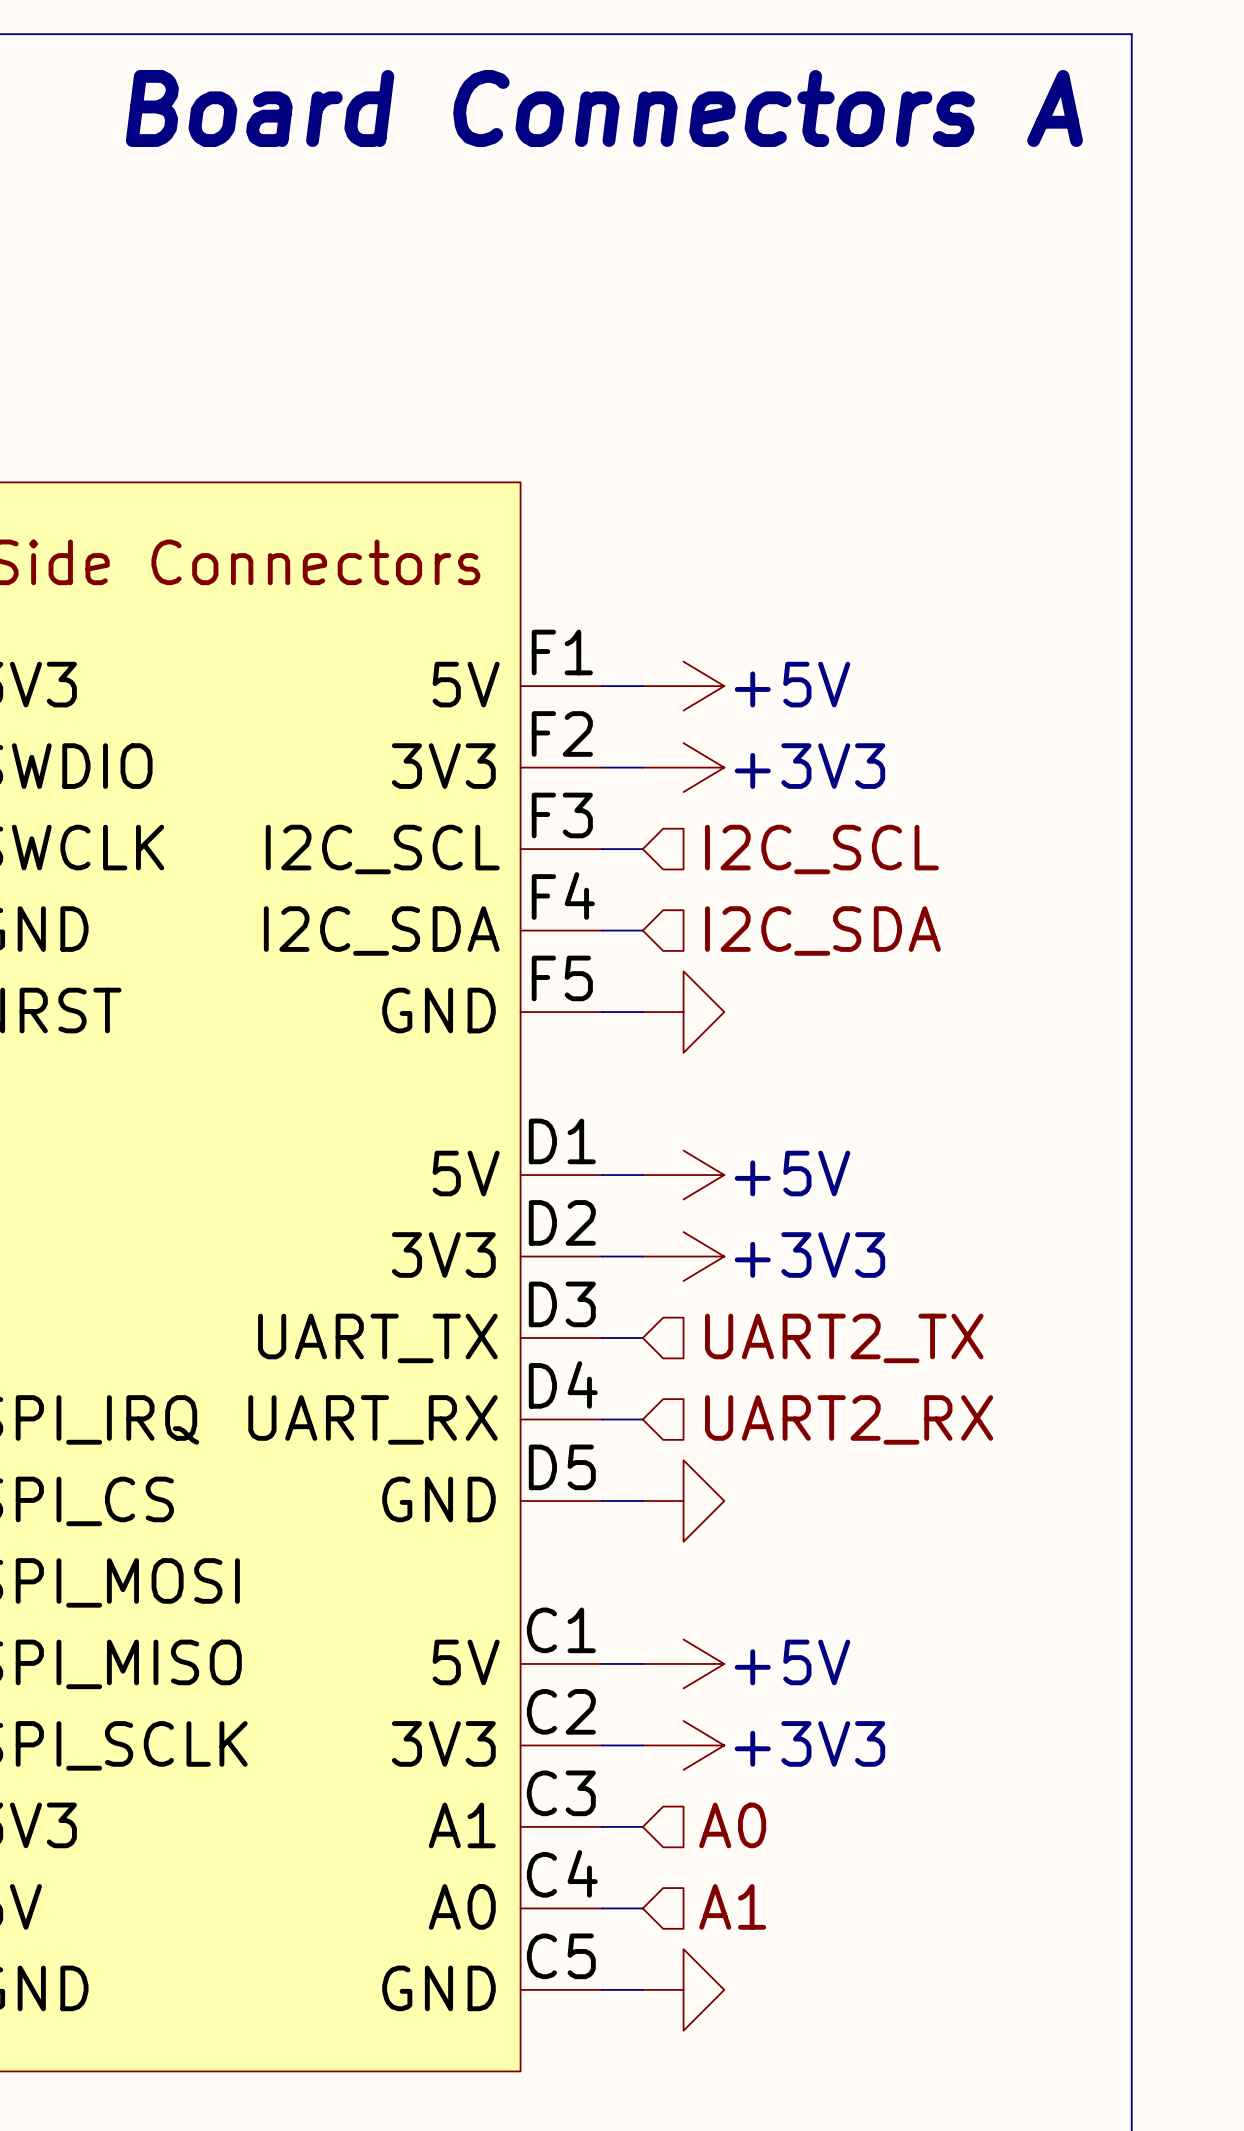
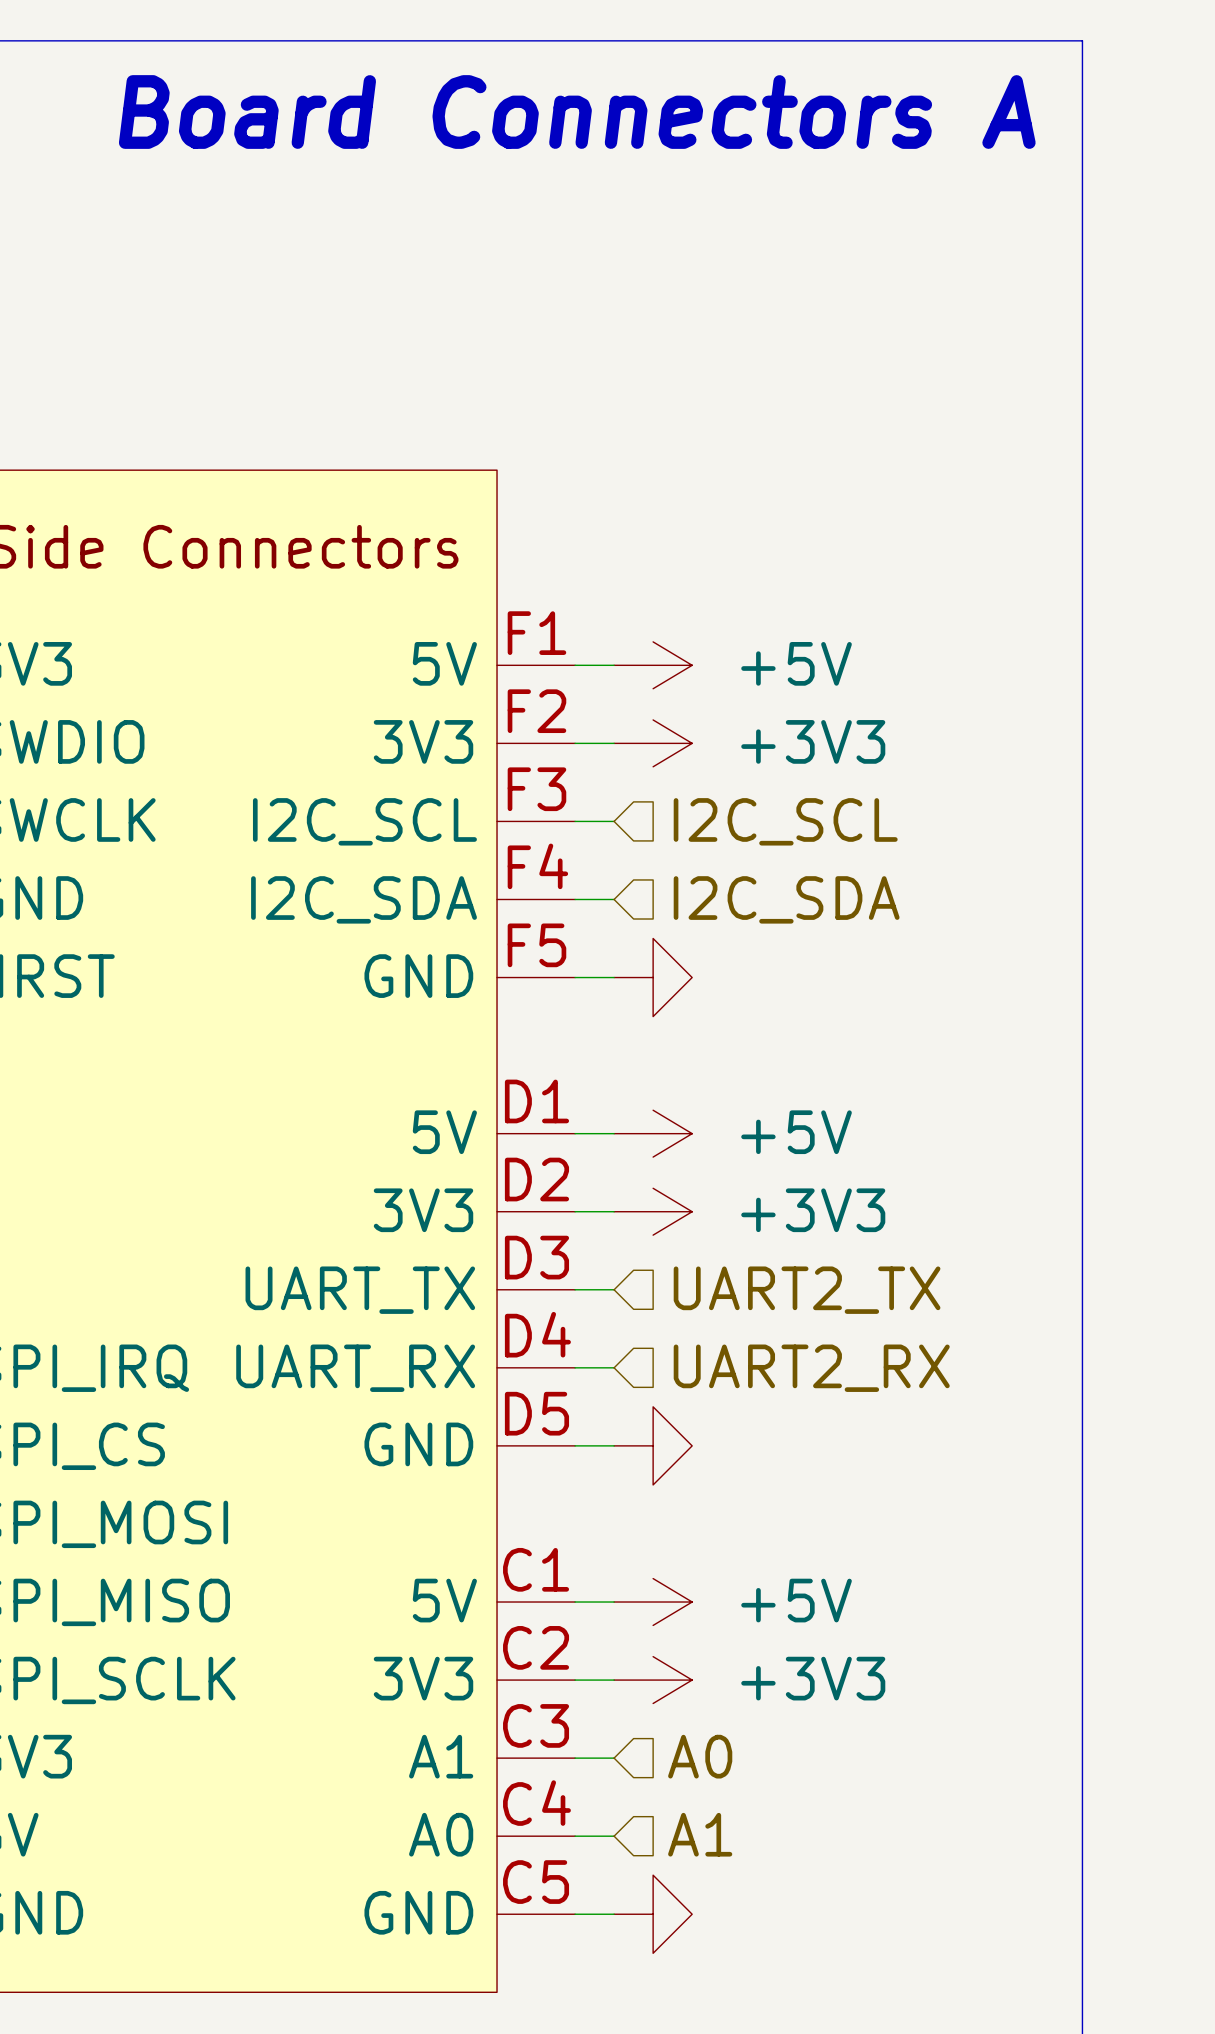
power symbol text position: +5V (792, 684) -> +5V (796, 663)
power symbol text position: +3V3 (809, 766) -> +3V3 (813, 741)
power symbol text position: +5V (792, 1173) -> +5V (796, 1132)
power symbol text position: +3V3 (809, 1255) -> +3V3 (813, 1210)
power symbol text position: +5V (792, 1662) -> +5V (796, 1600)
power symbol text position: +3V3 (809, 1743) -> +3V3 (813, 1678)

